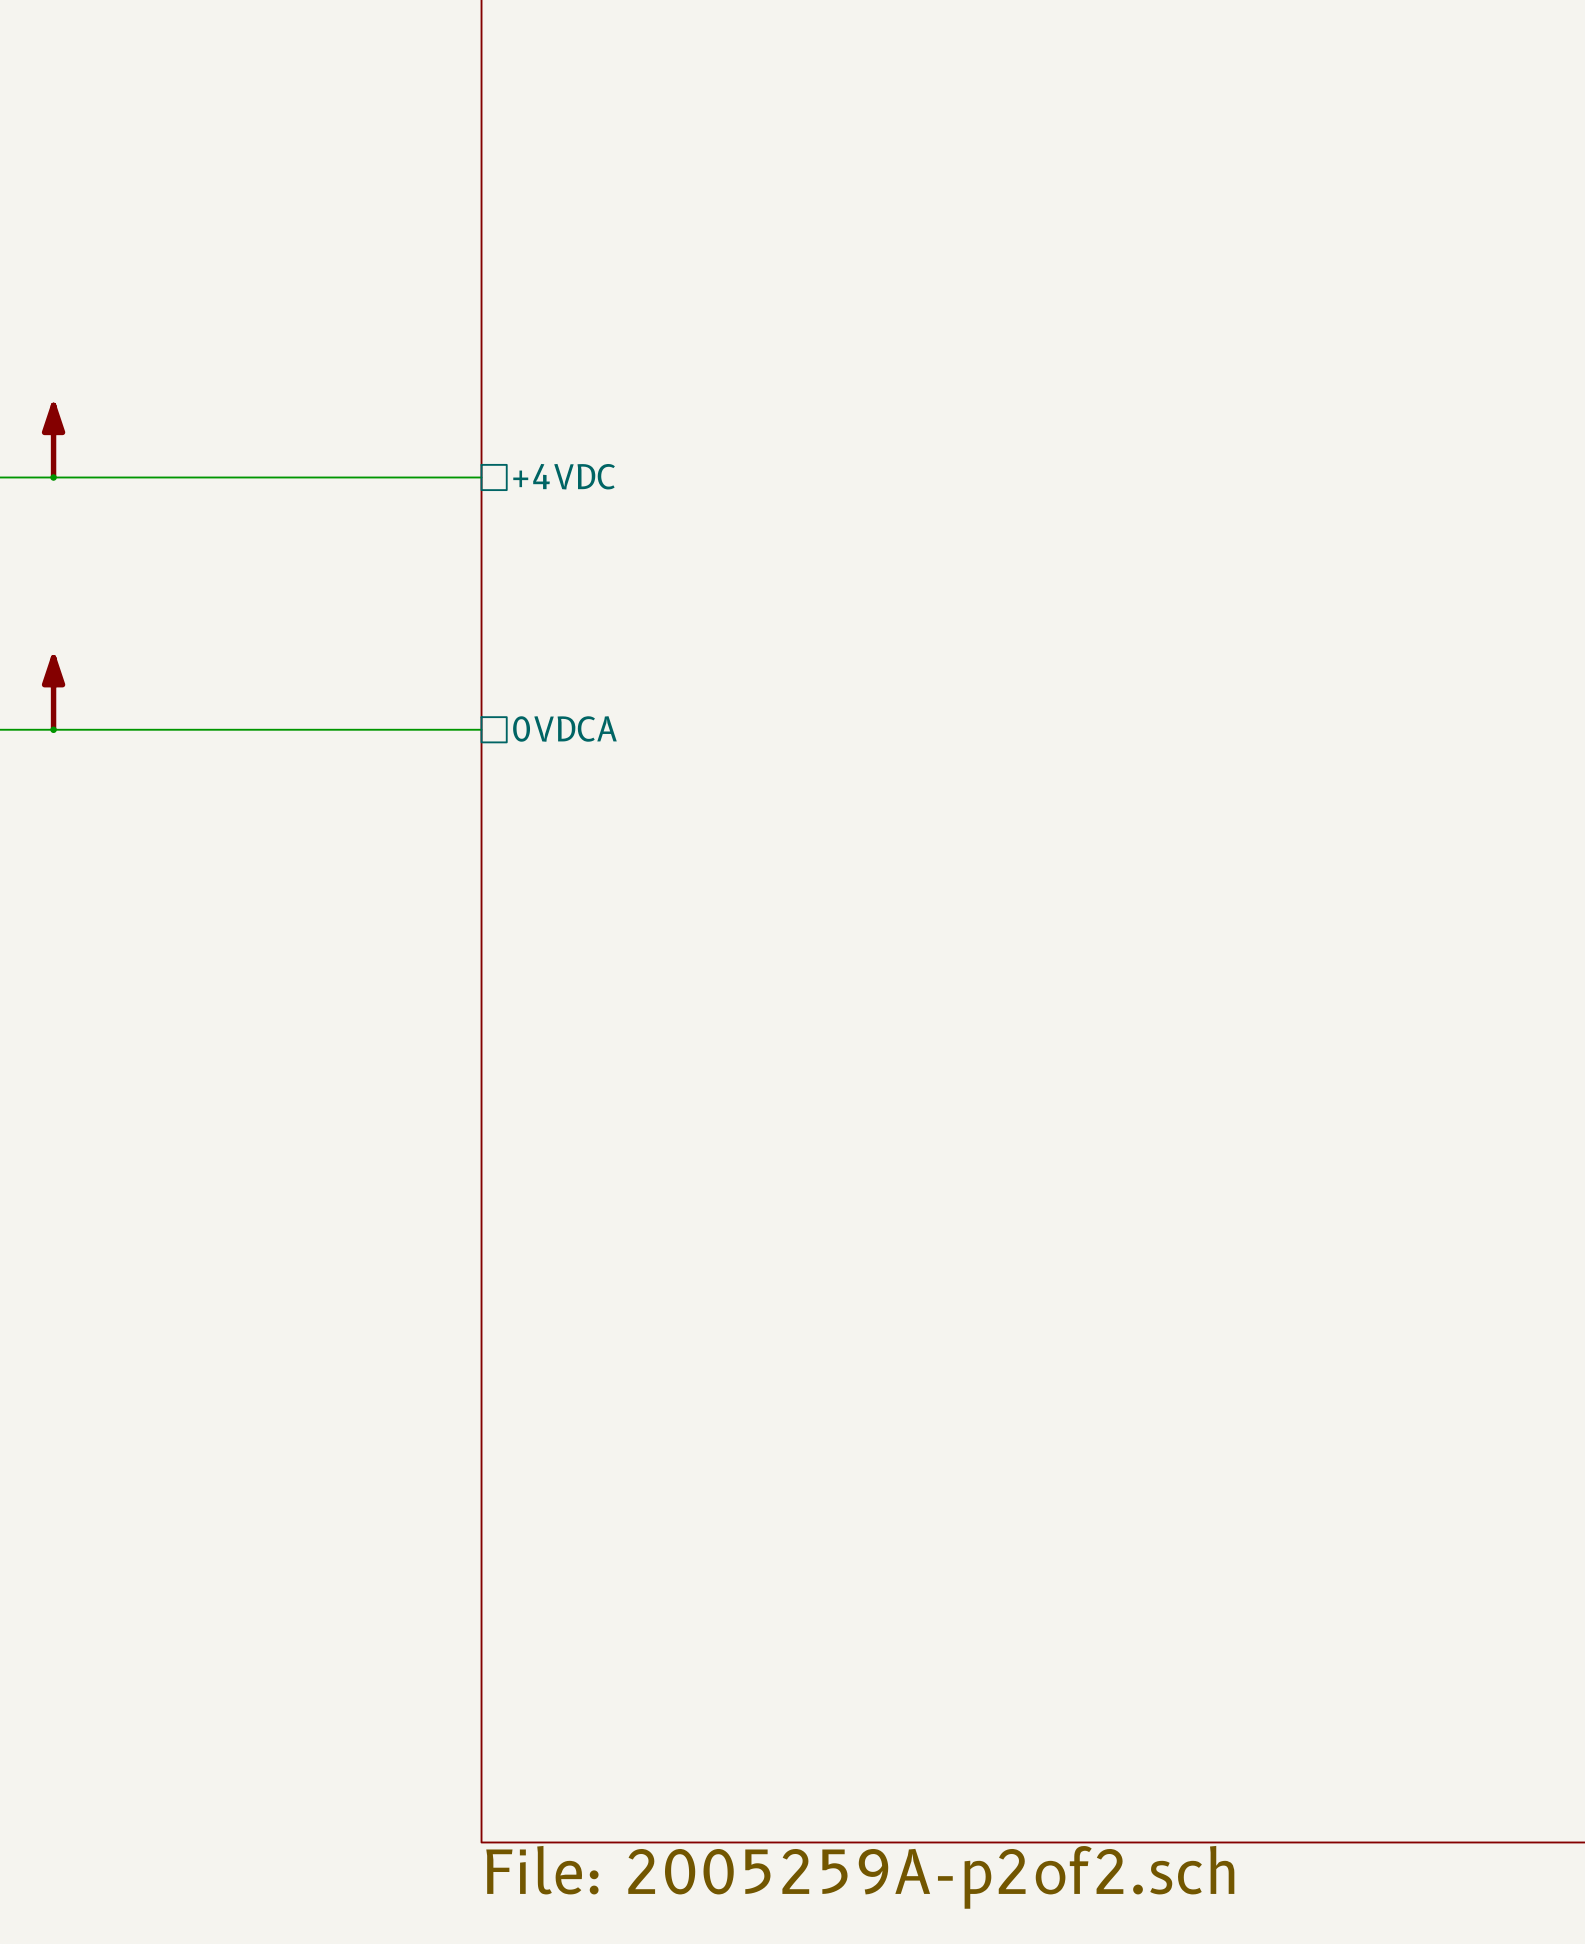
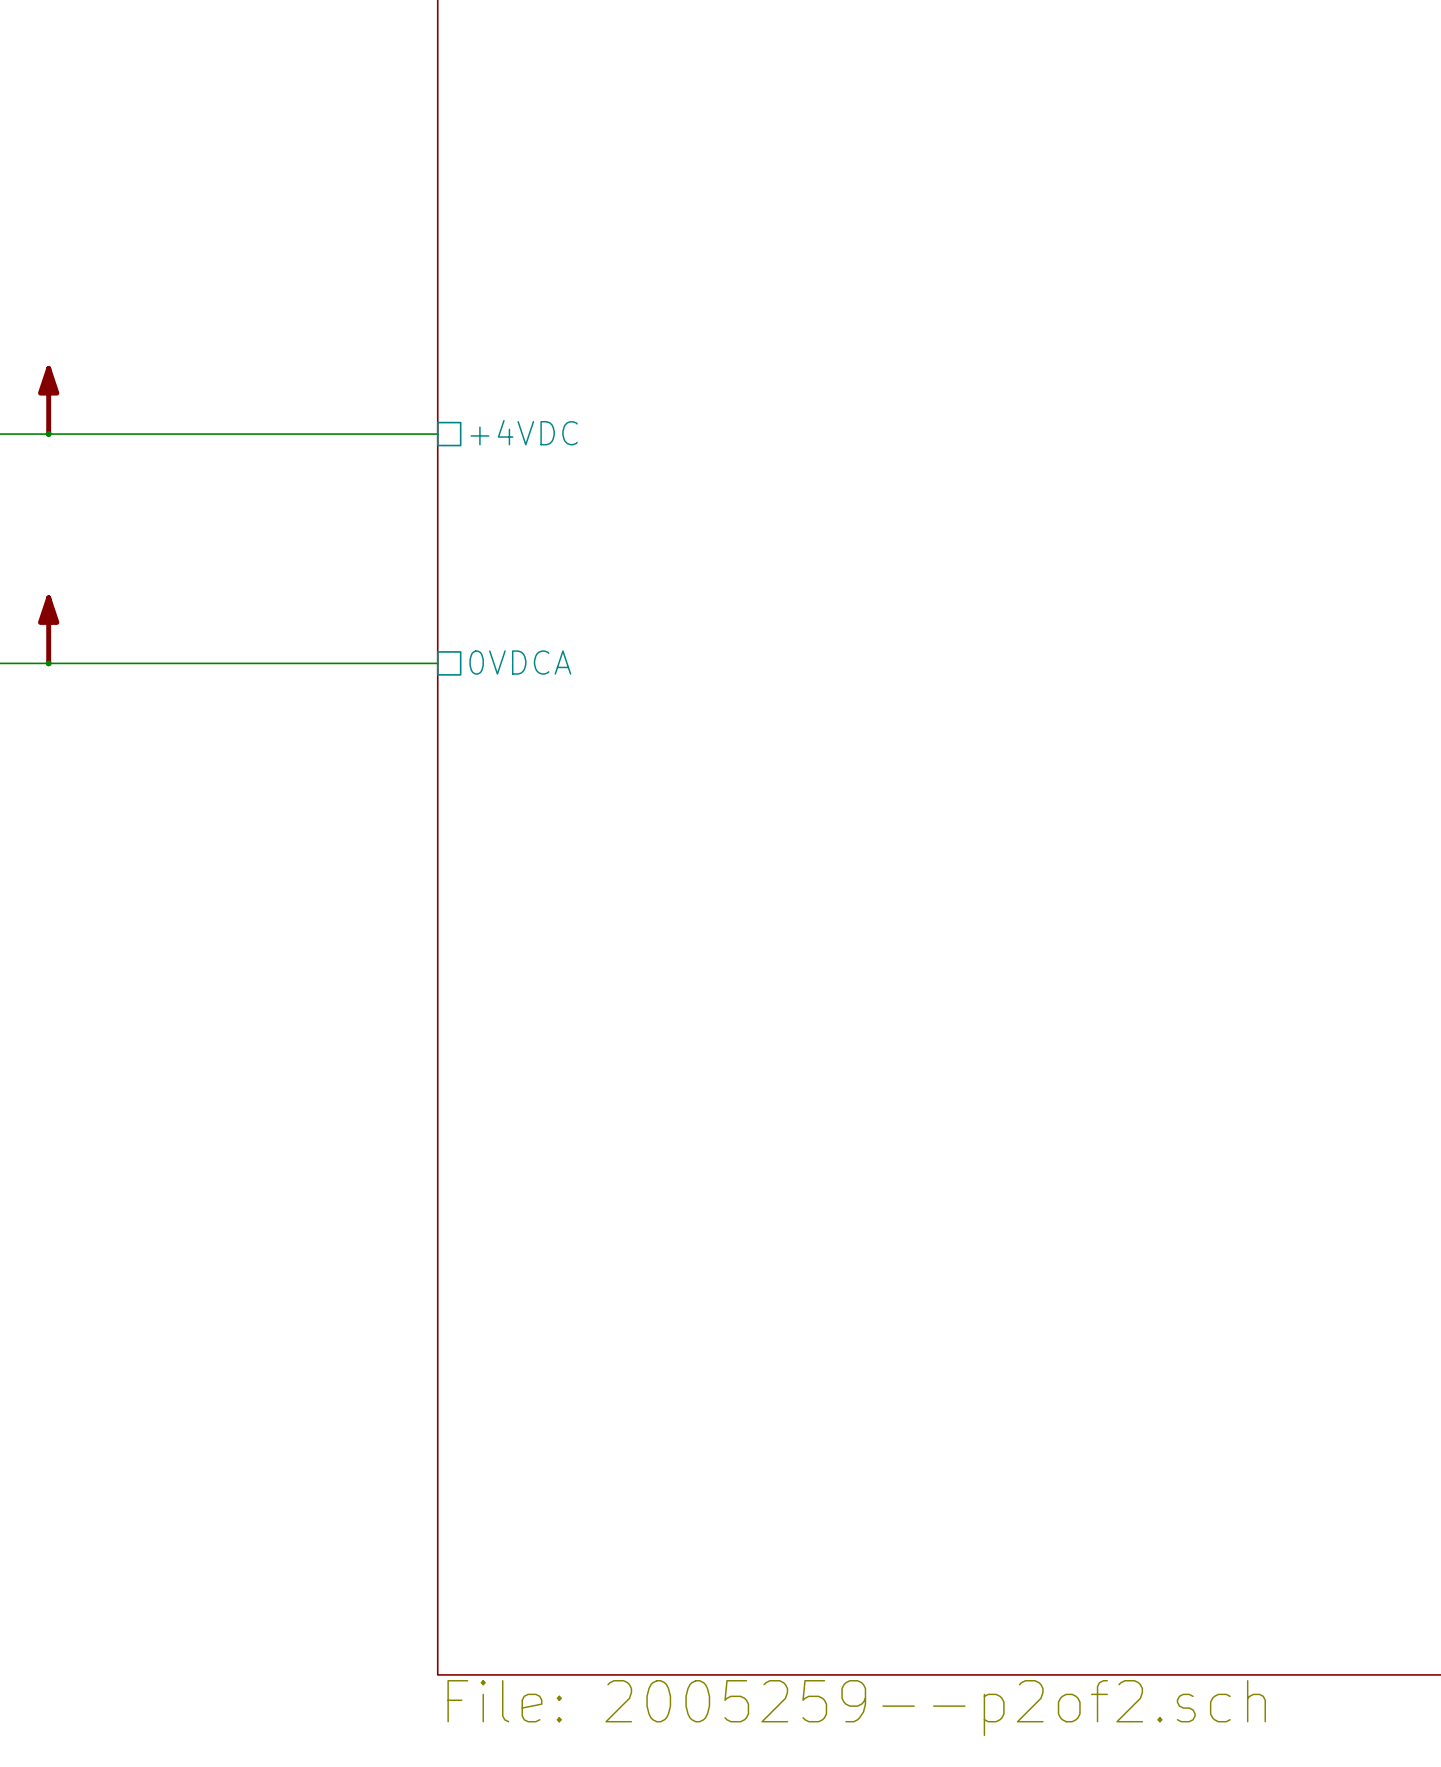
sheet value: File: 2005259A-p2of2.sch (860, 1877) -> File: 2005259--p2of2.sch (856, 1708)

